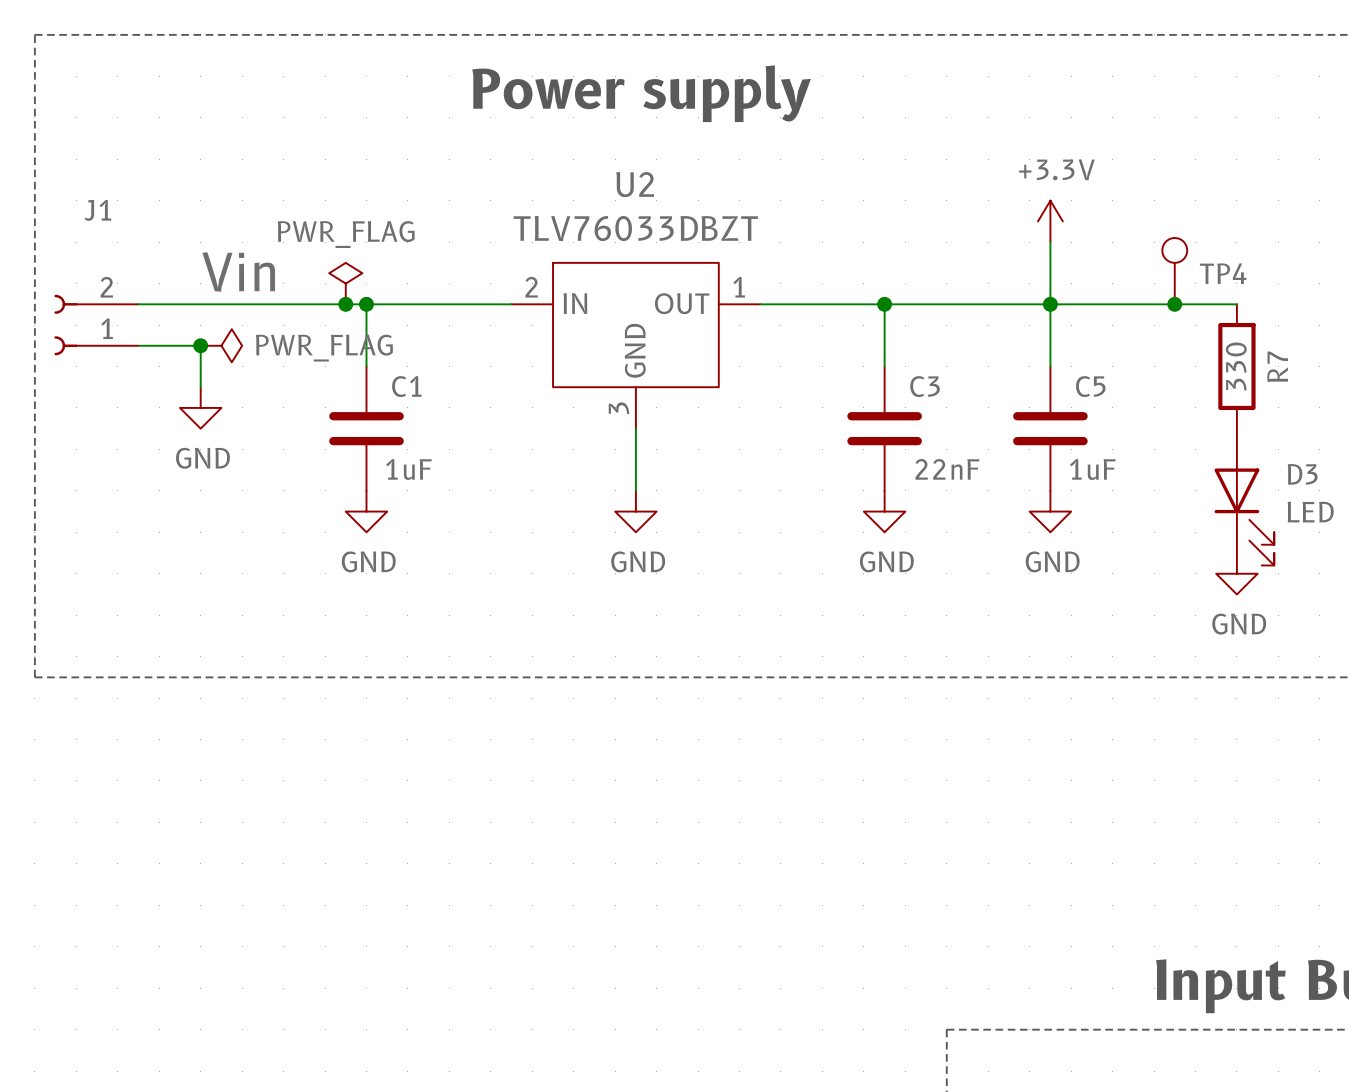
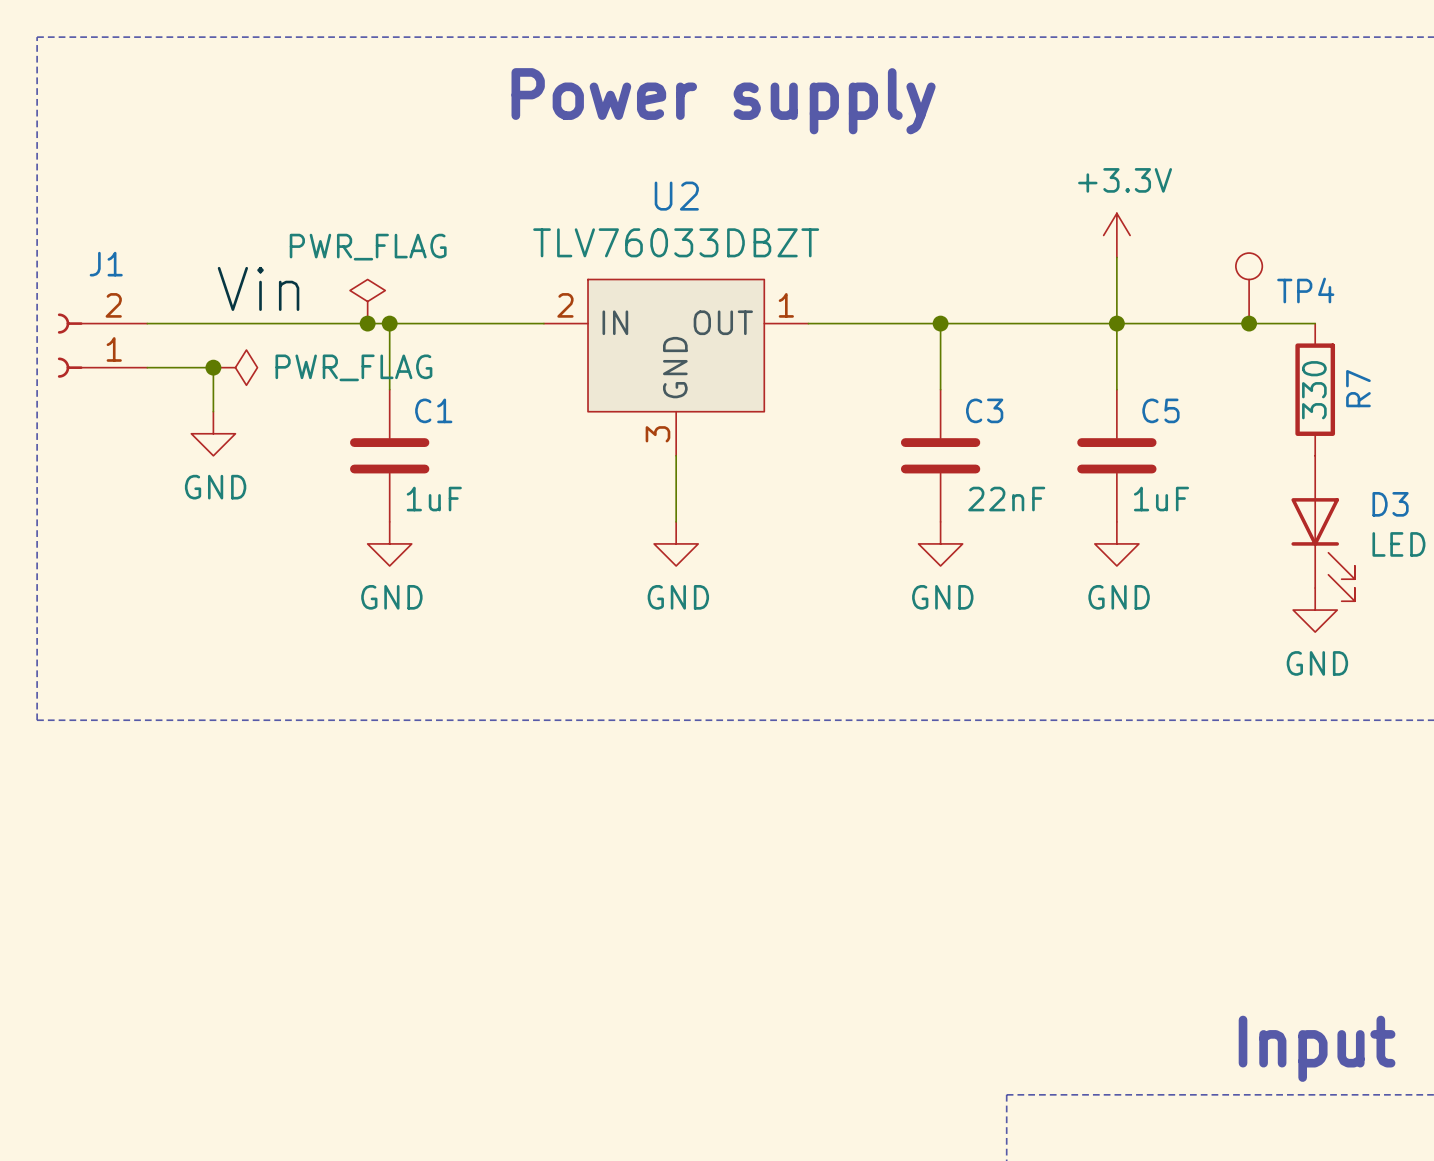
J1 name position: J1 (97, 210) -> J1 (106, 264)

